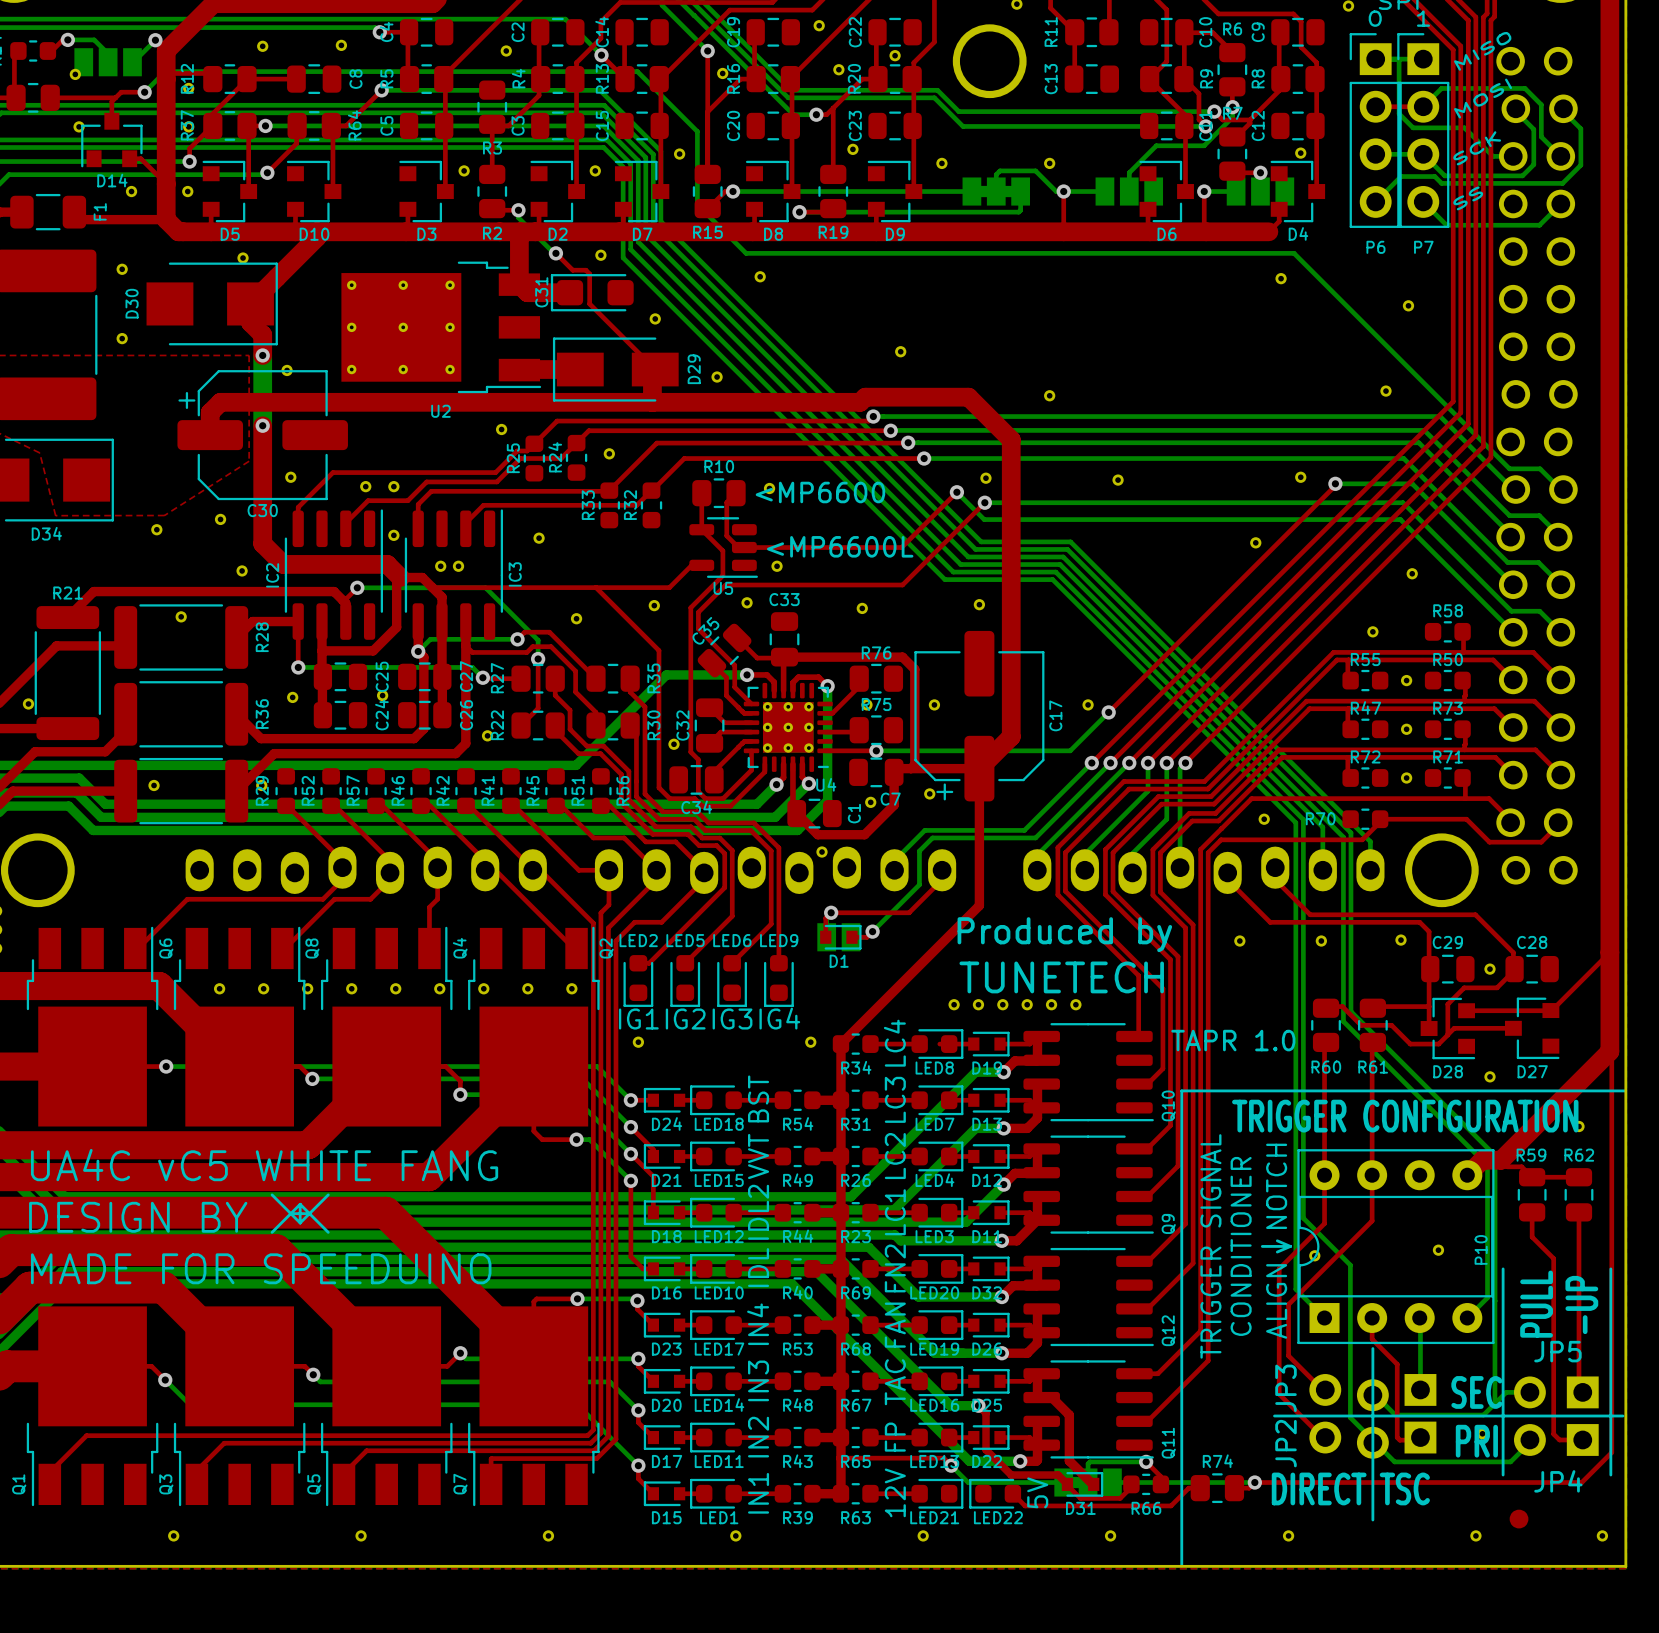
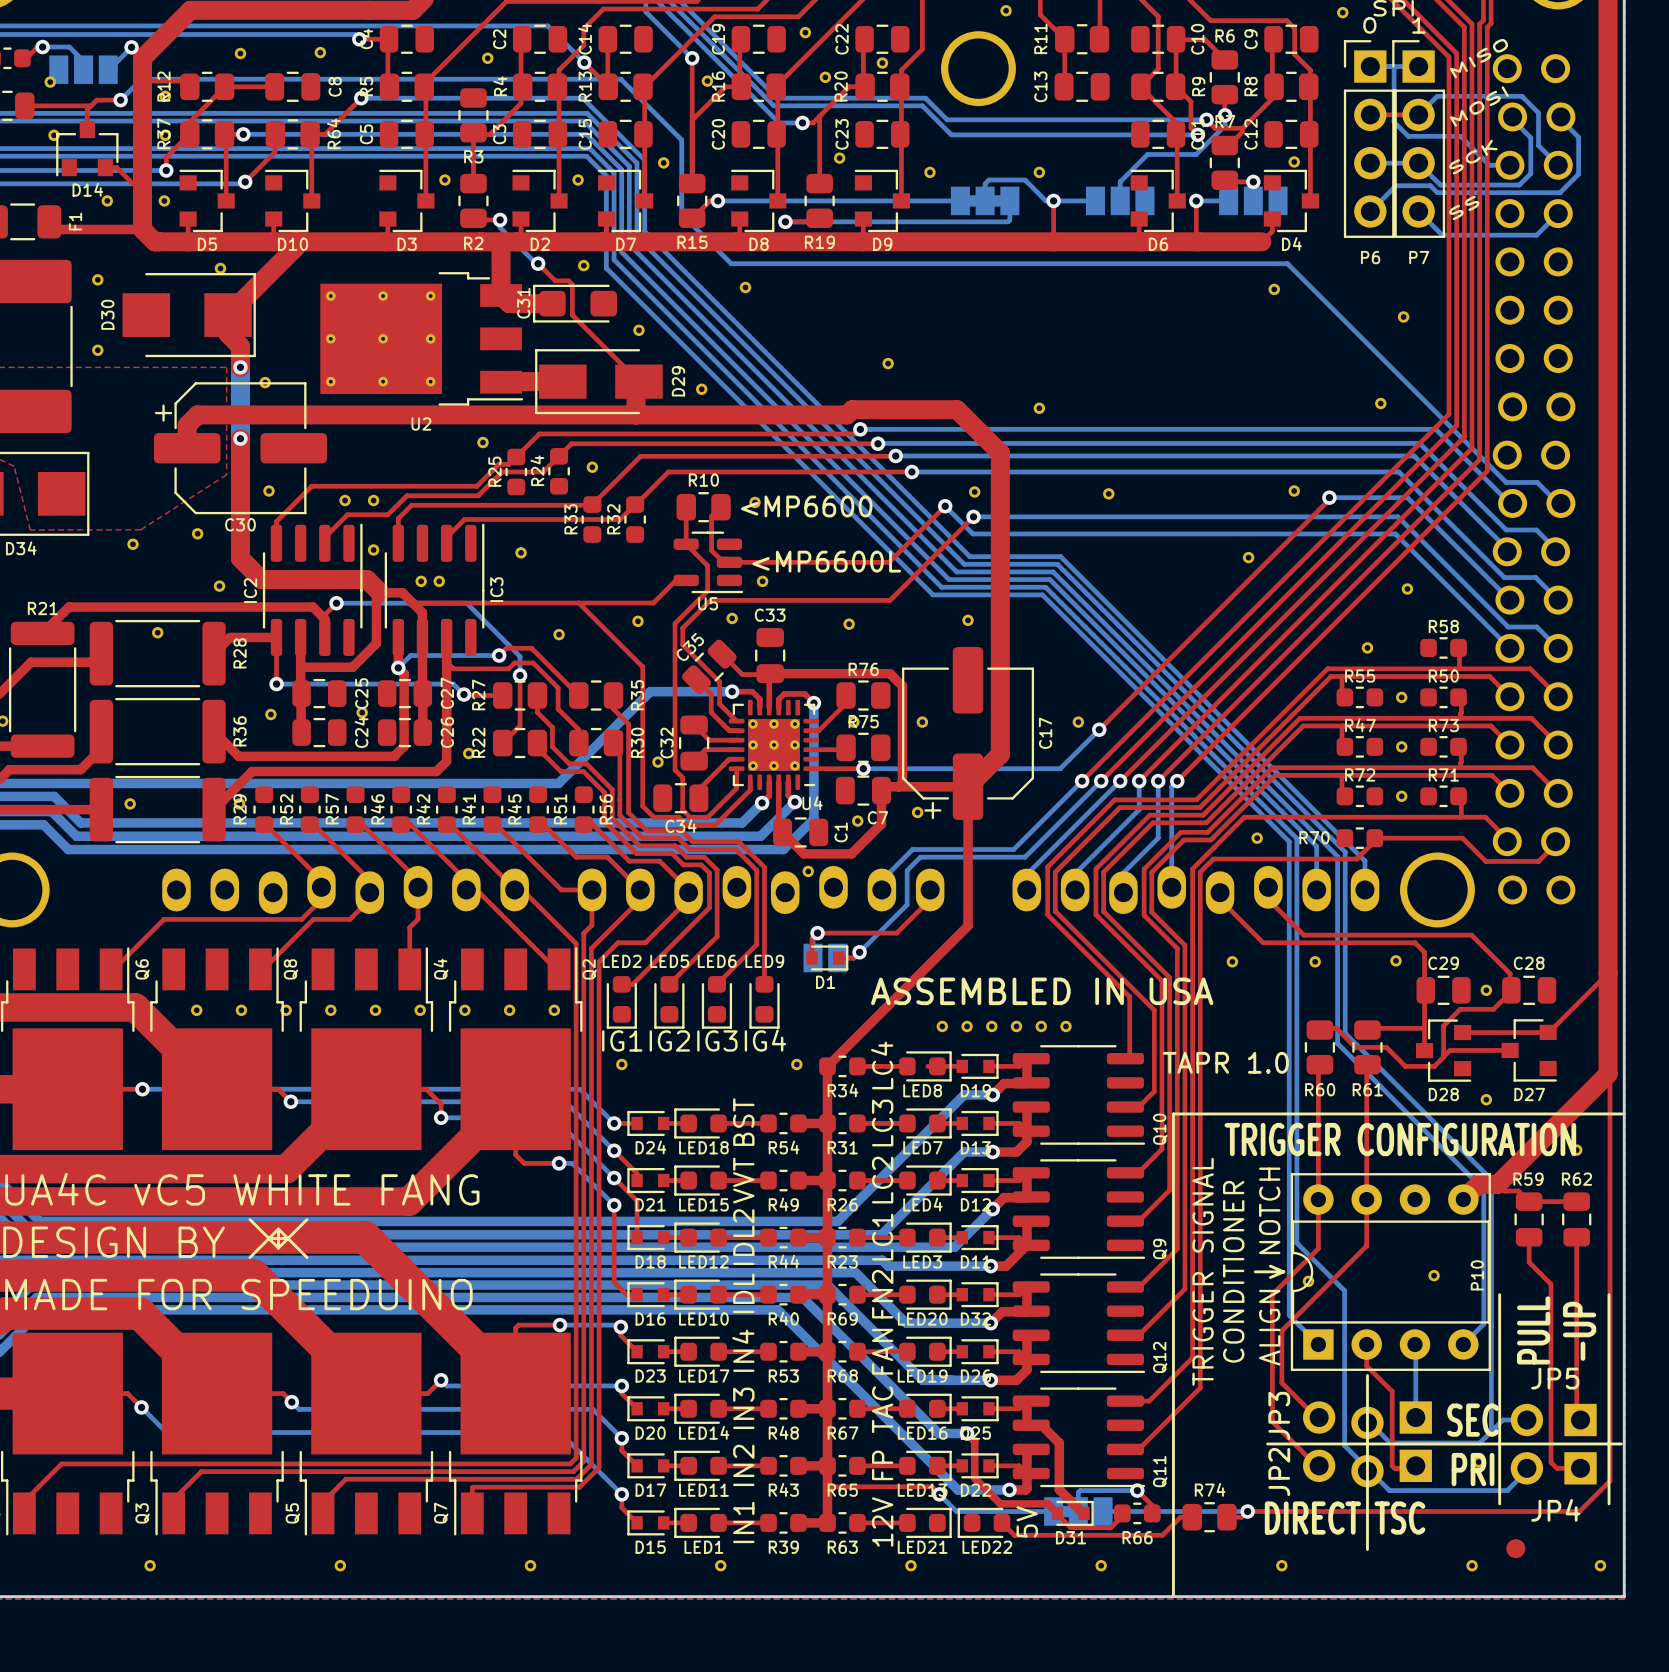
text: Produced by (1064, 934) -> none
text: TUNETECH (1061, 977) -> ASSEMBLED IN USA (1042, 991)

